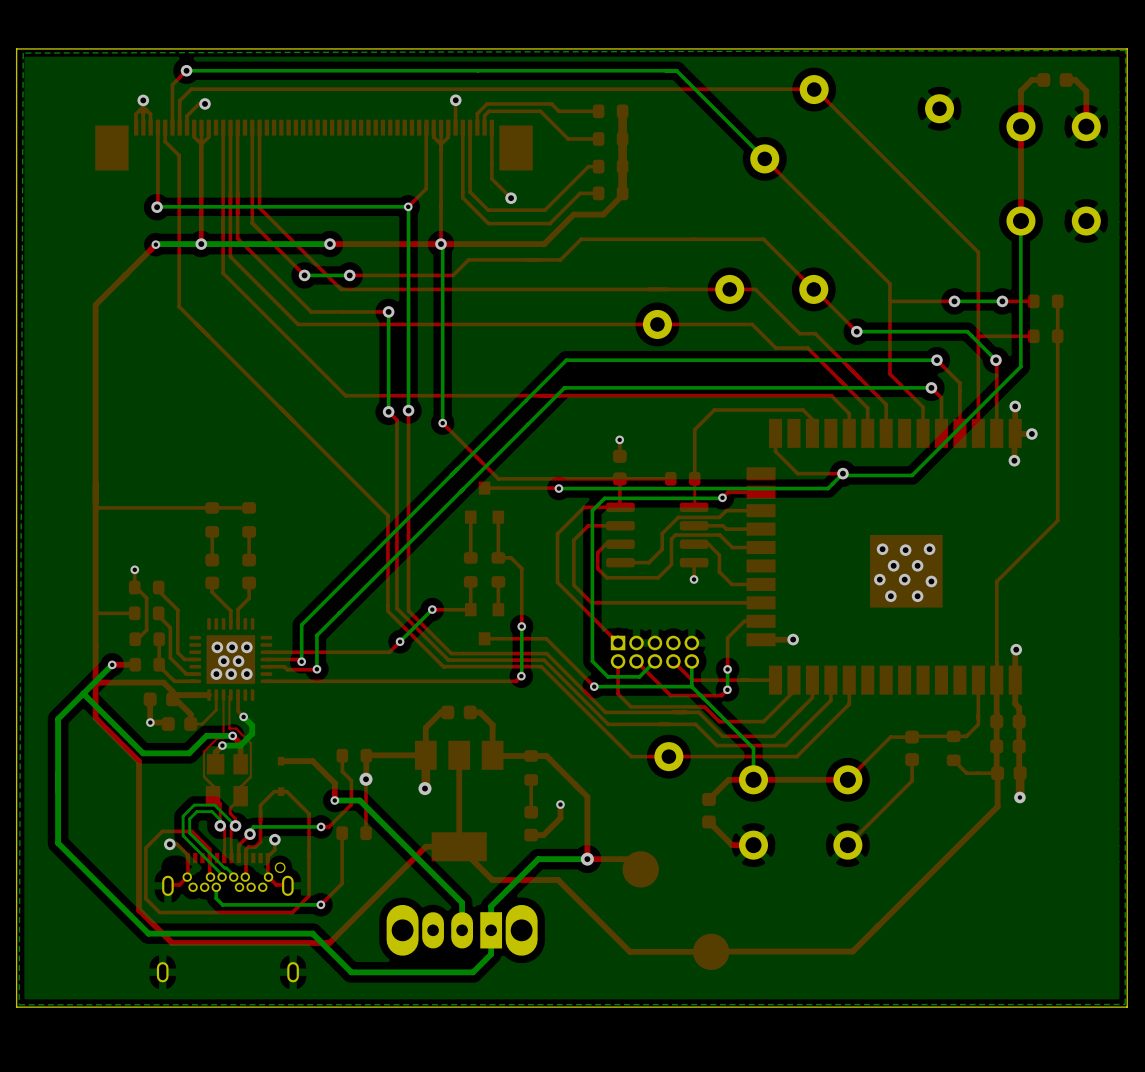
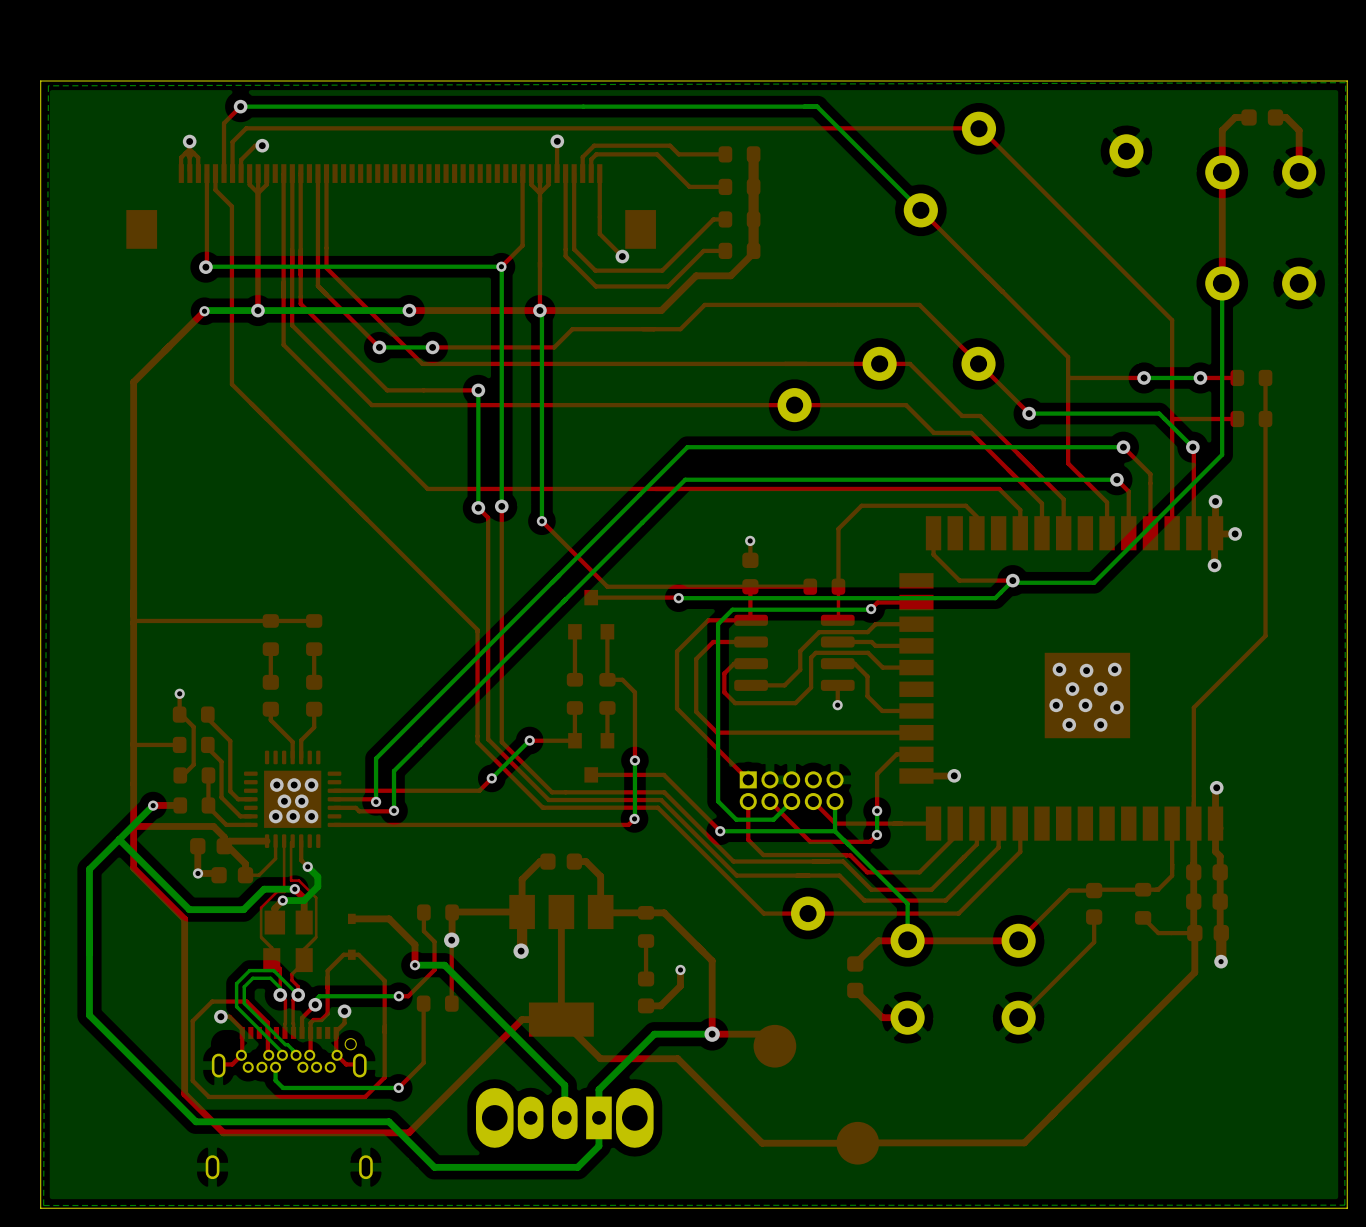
part footprint: [95, 119, 533, 171] -> [126, 164, 656, 249]

